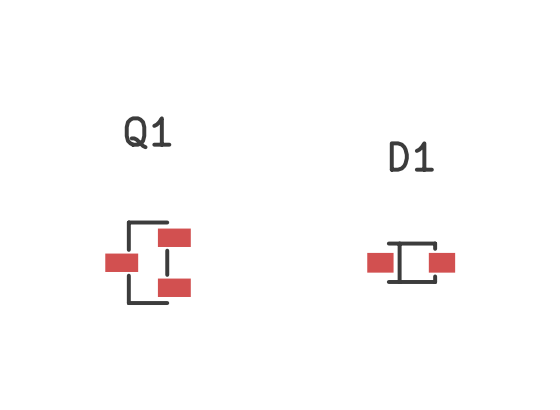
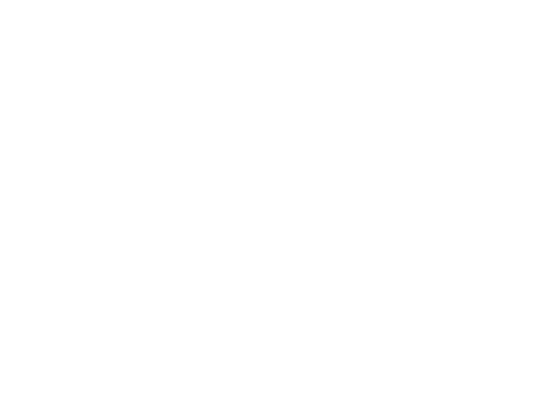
Q1: (148, 262) -> none
D1: (411, 262) -> none

